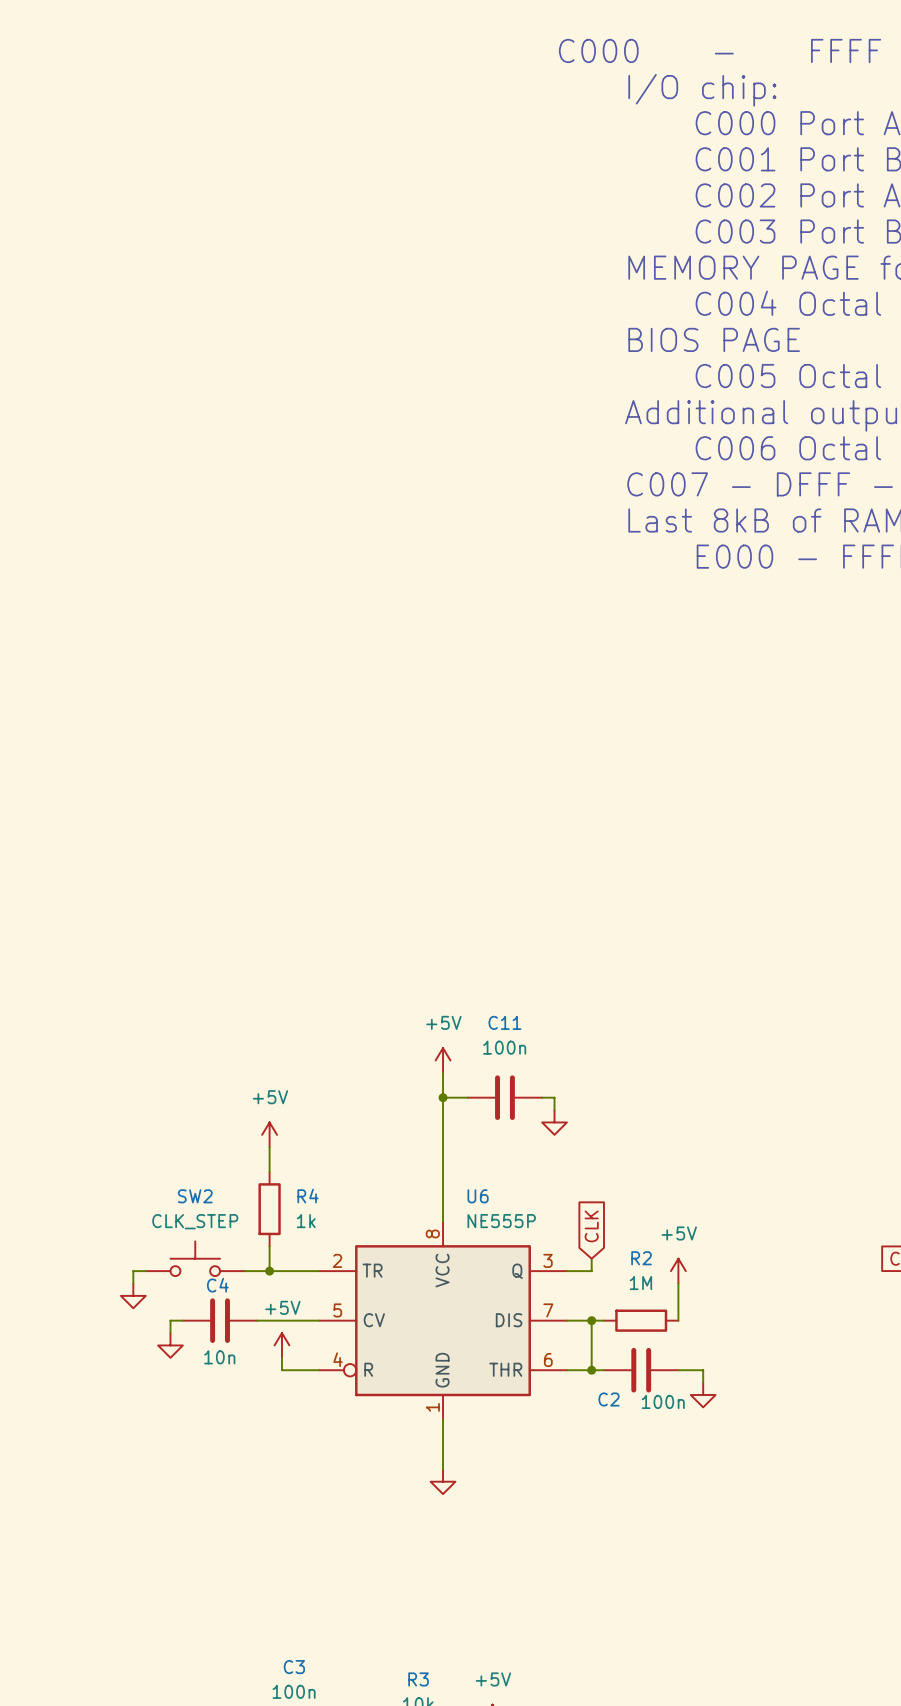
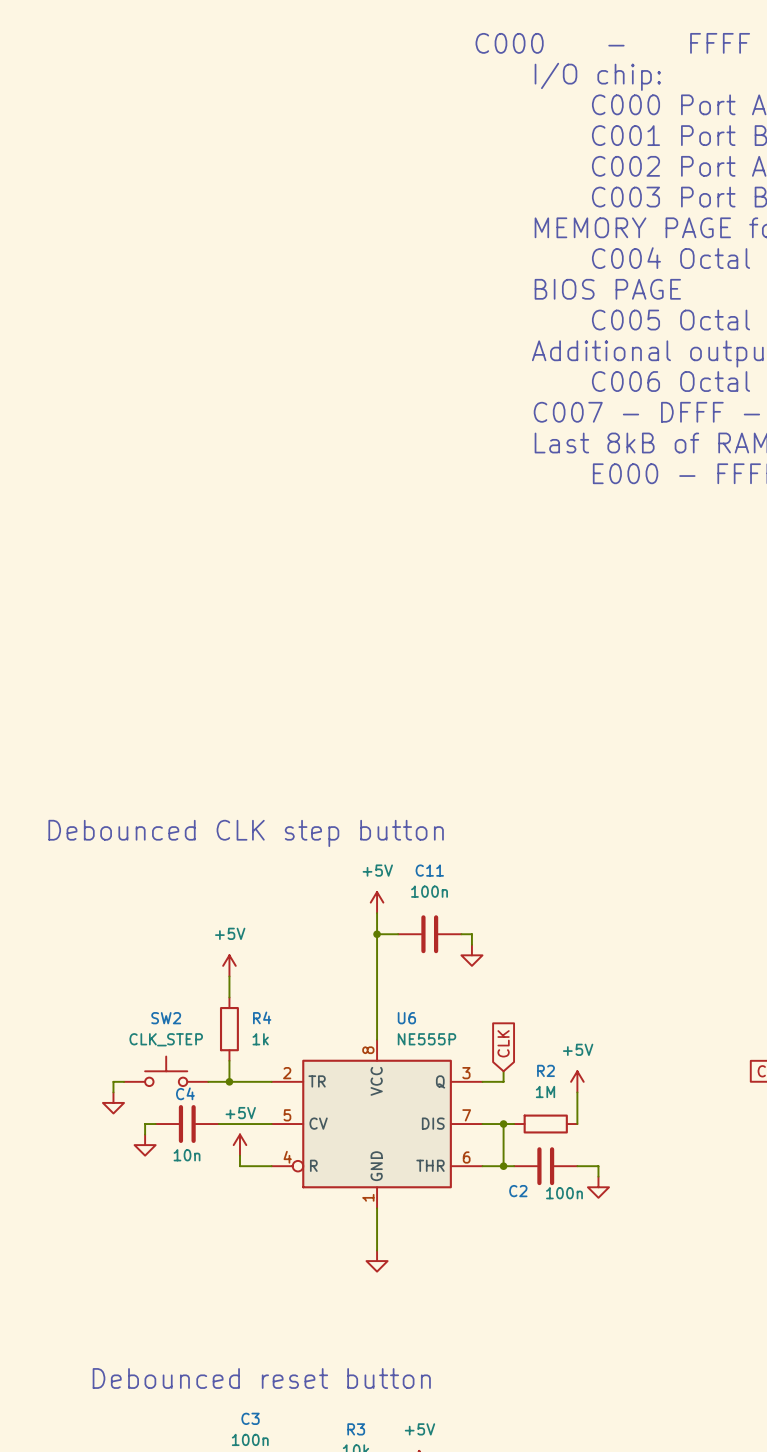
text: none -> Debounced CLK step button (246, 833)
text: none -> Debounced reset button (261, 1378)

